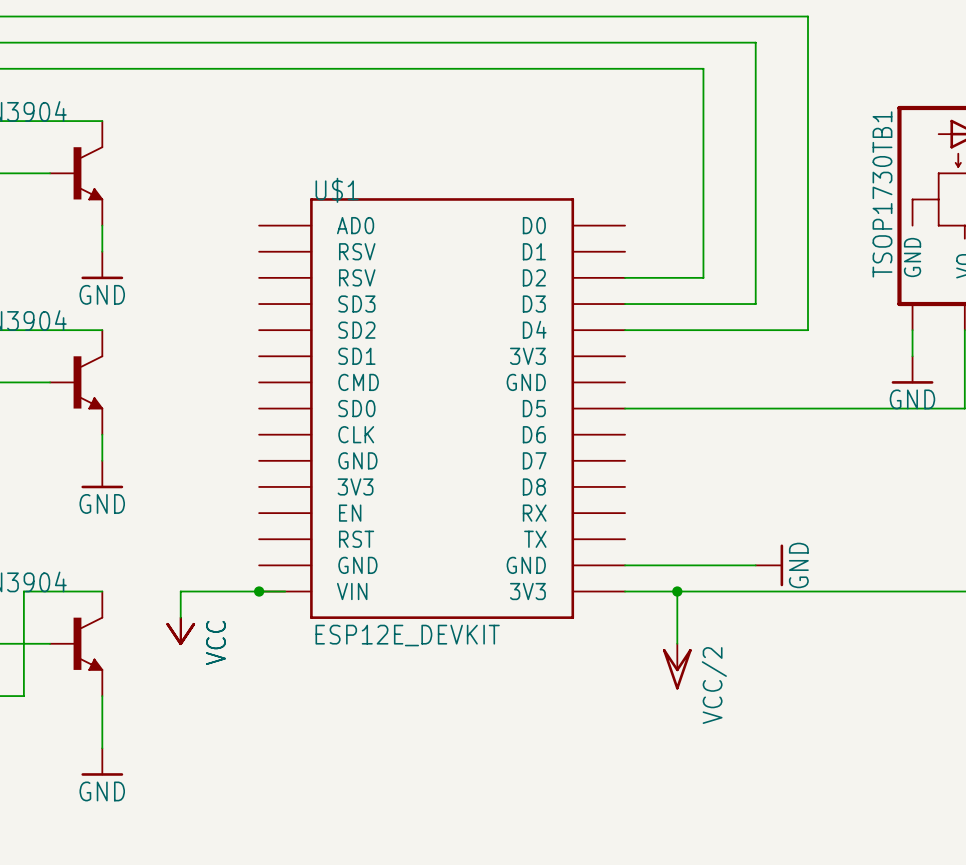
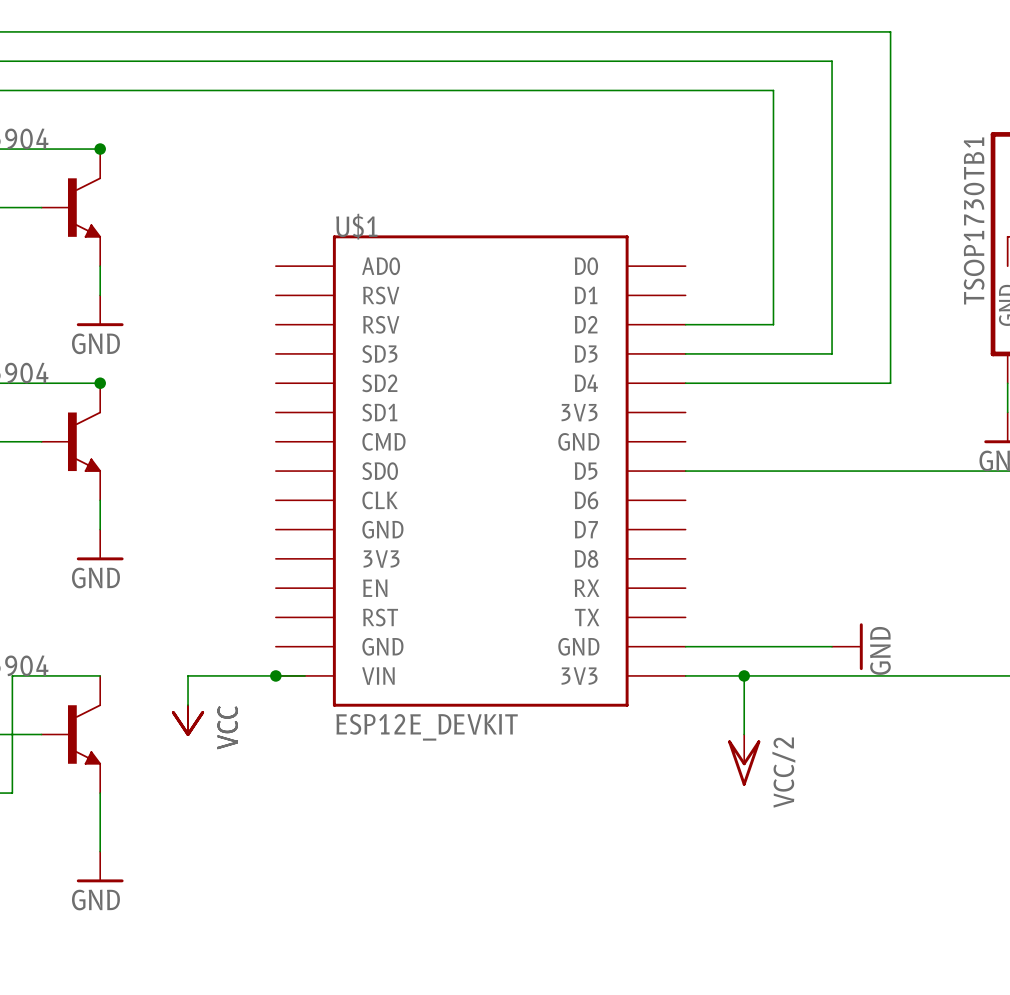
junction: none -> (100, 149)
junction: none -> (100, 383)

